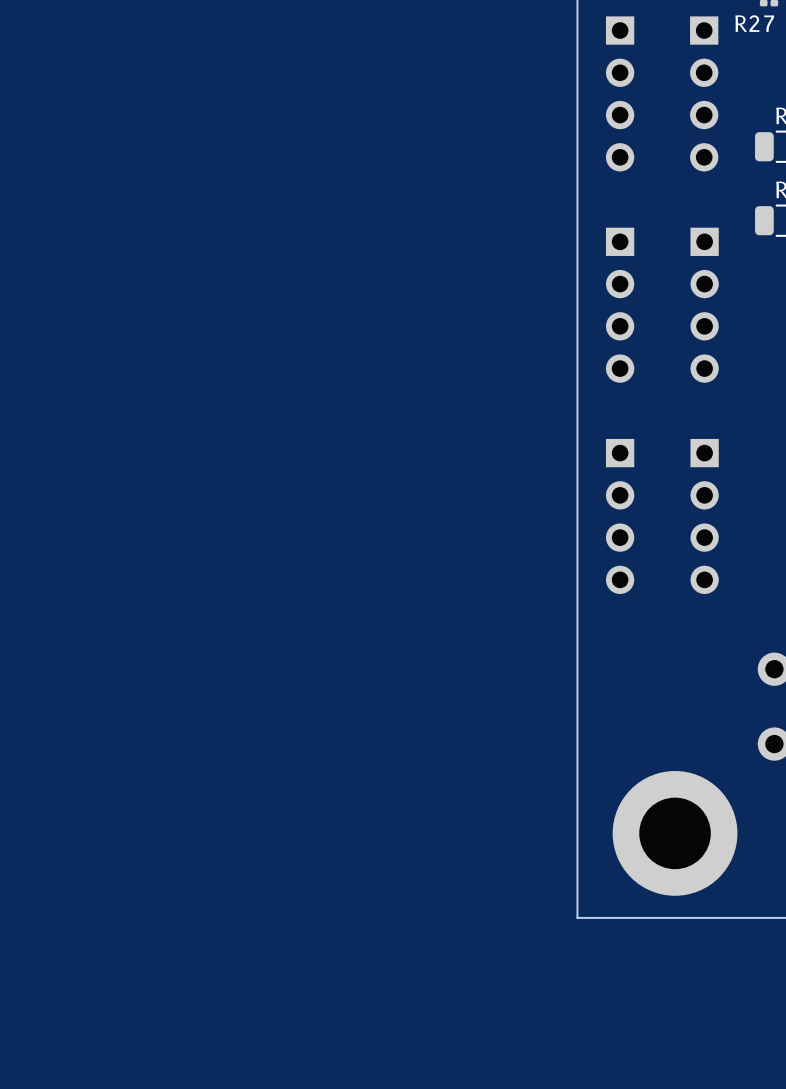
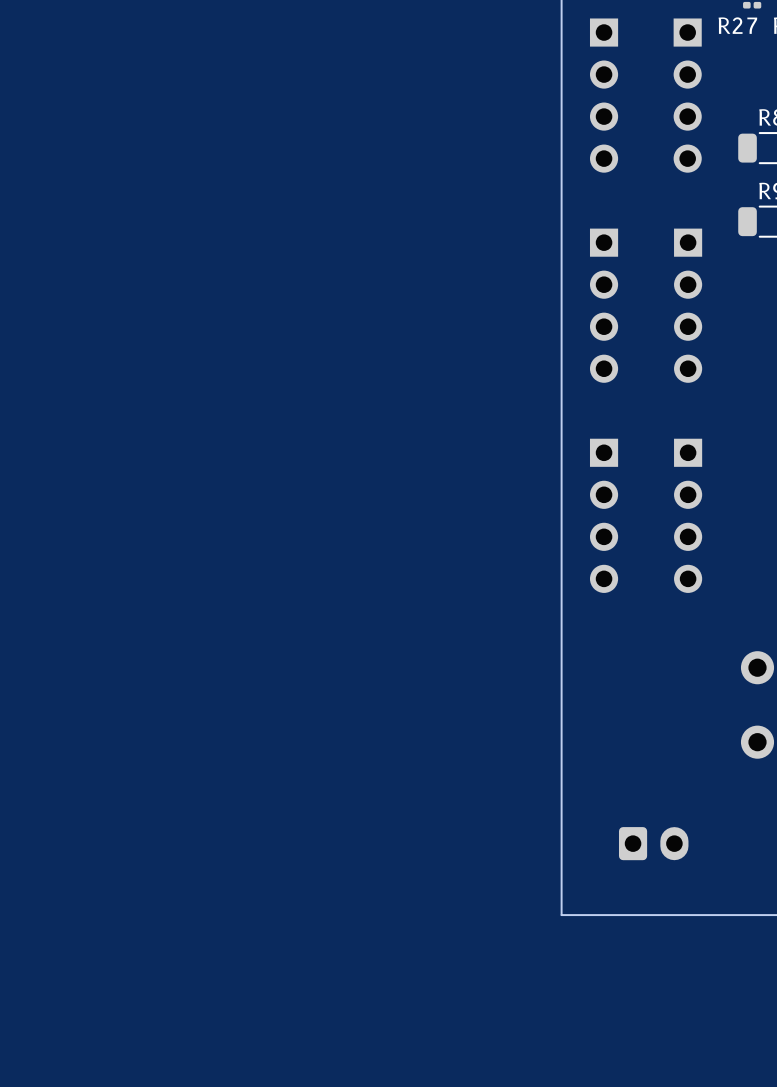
part footprint: [612, 771, 738, 896] -> [618, 827, 689, 861]

